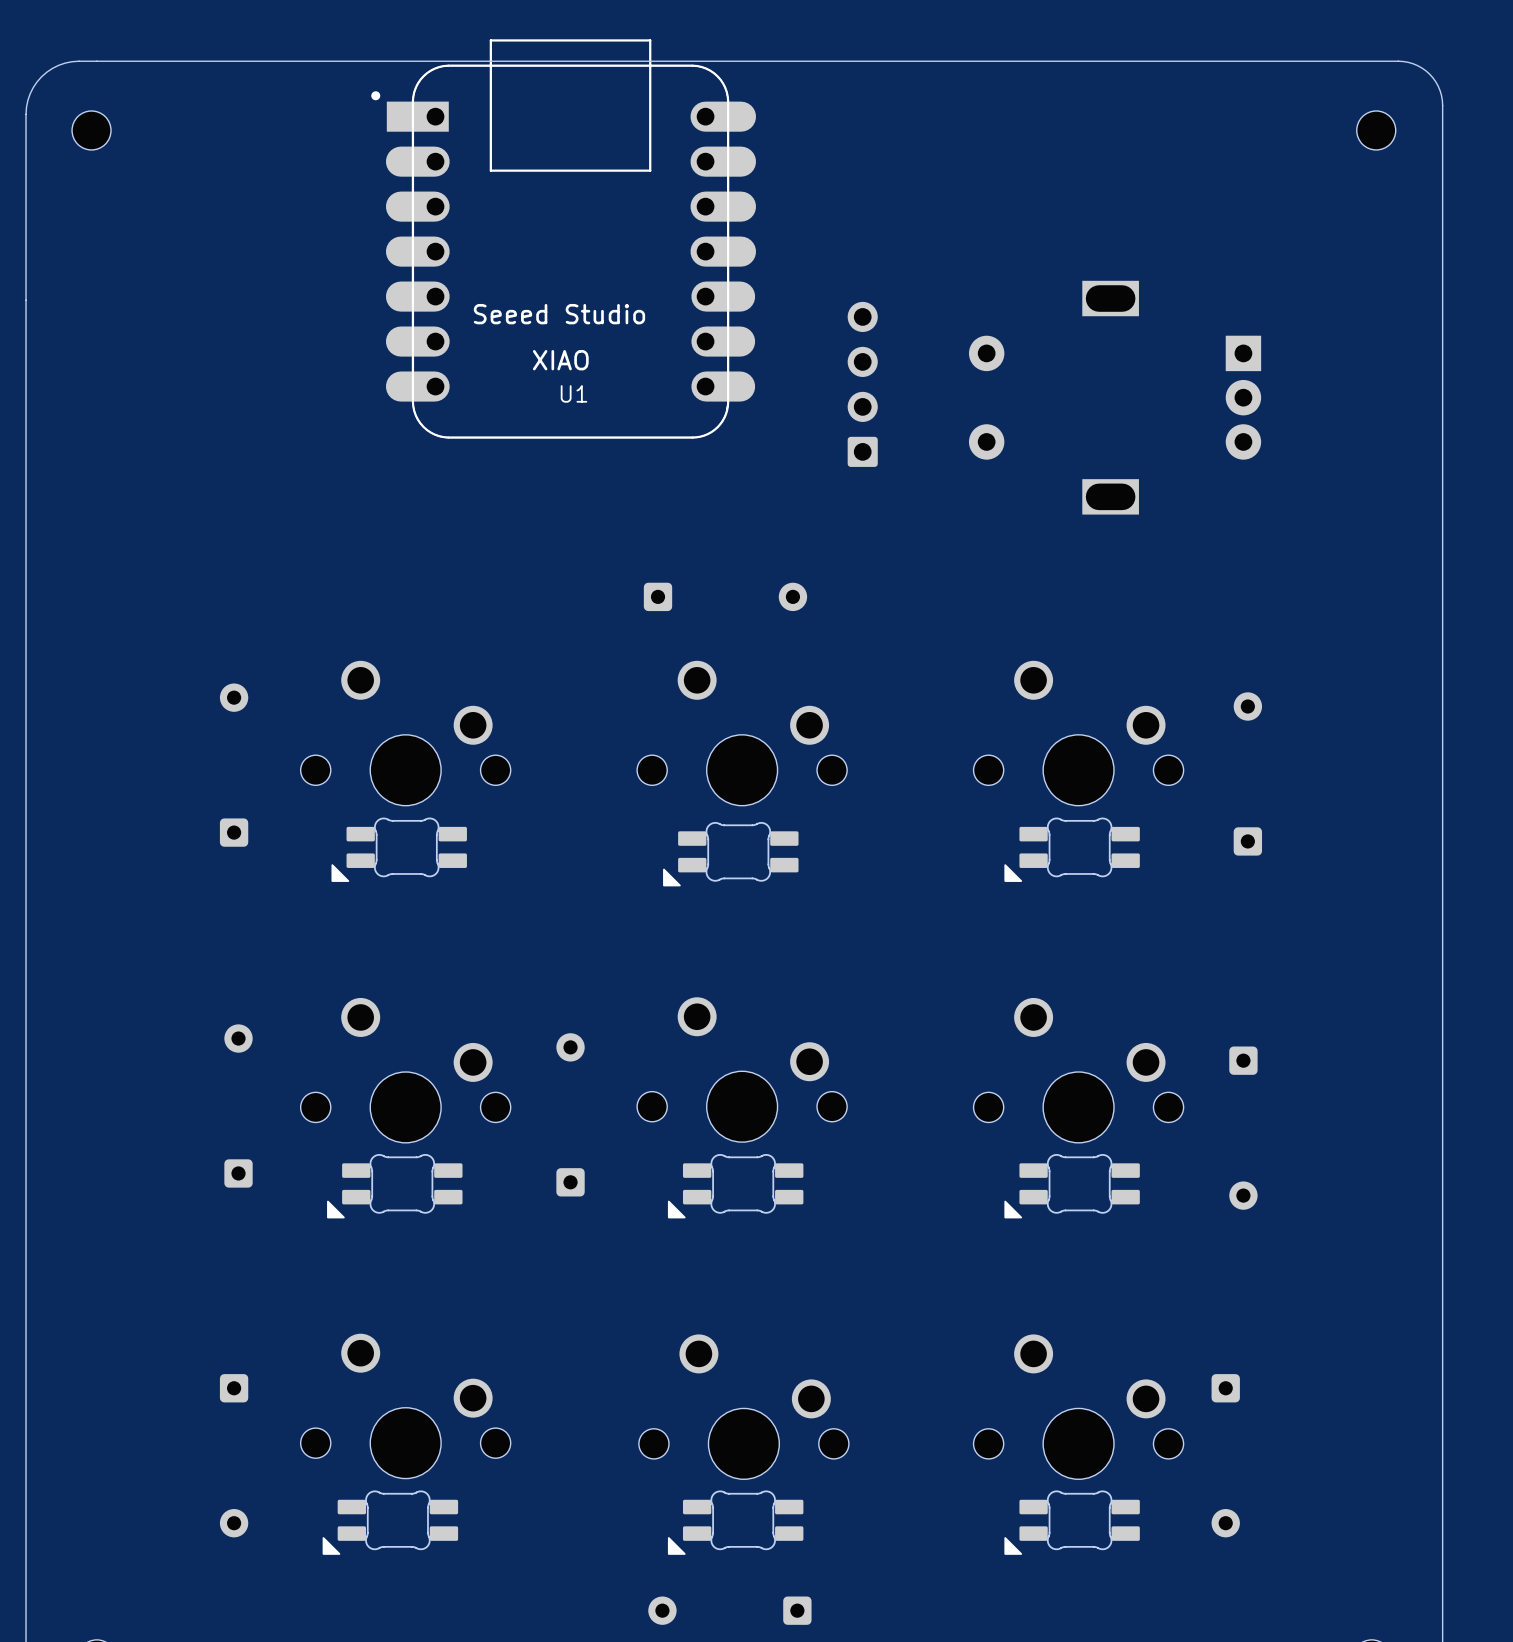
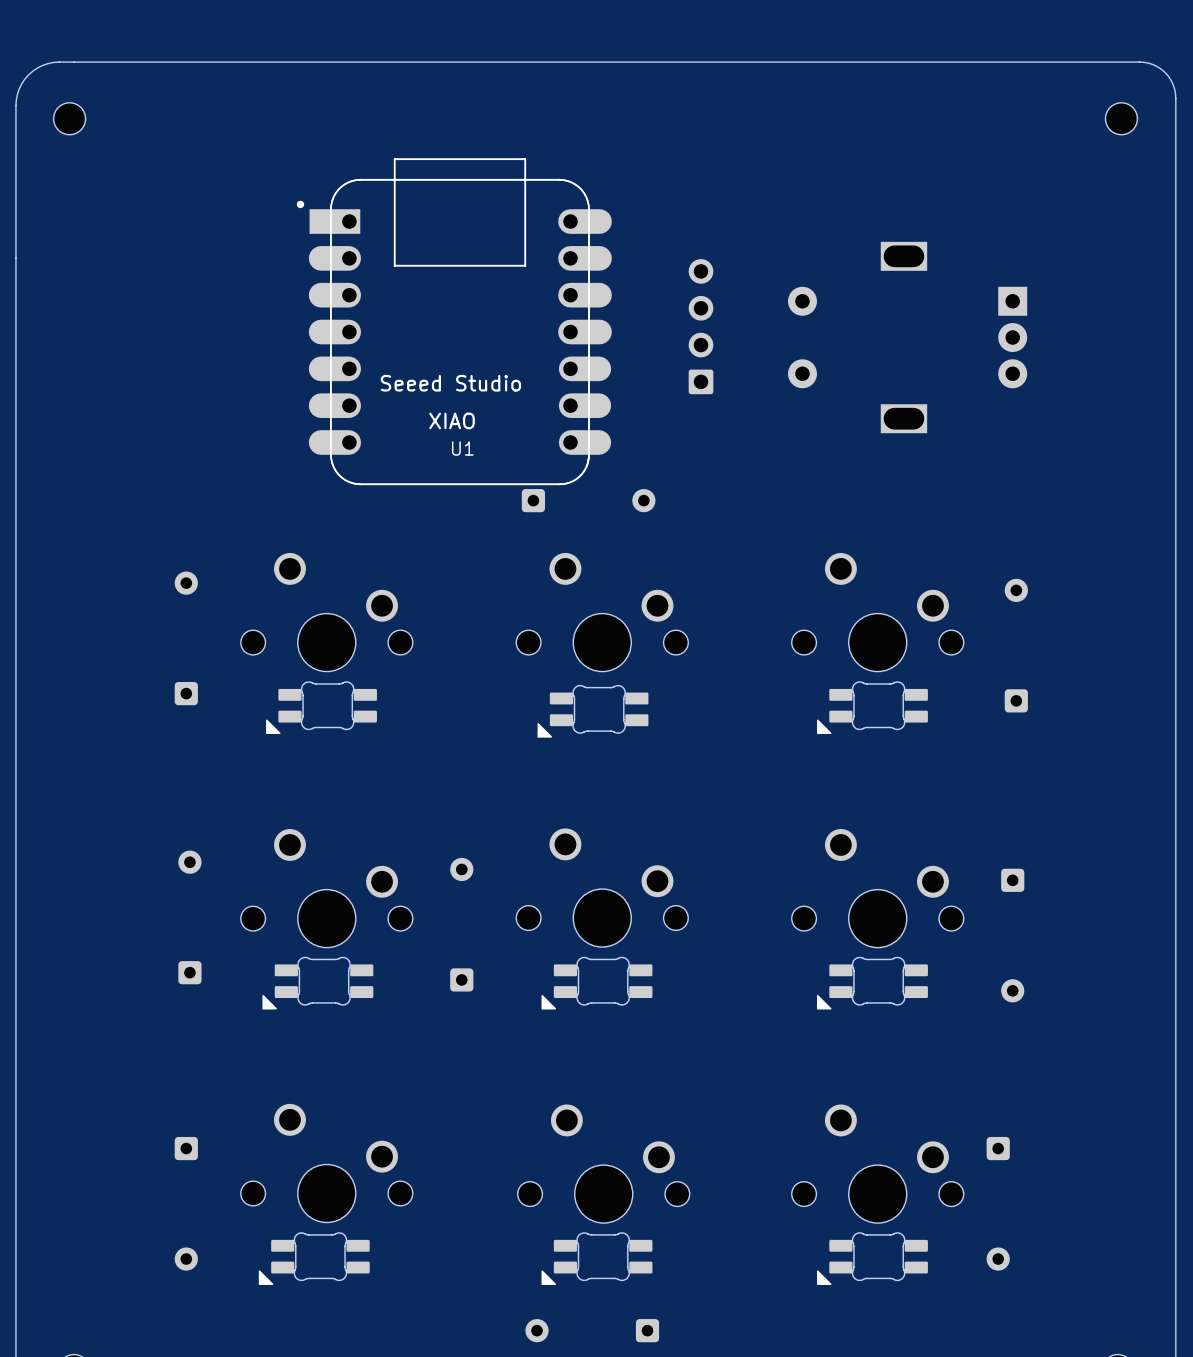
U1 position: (563, 238) -> (454, 321)

